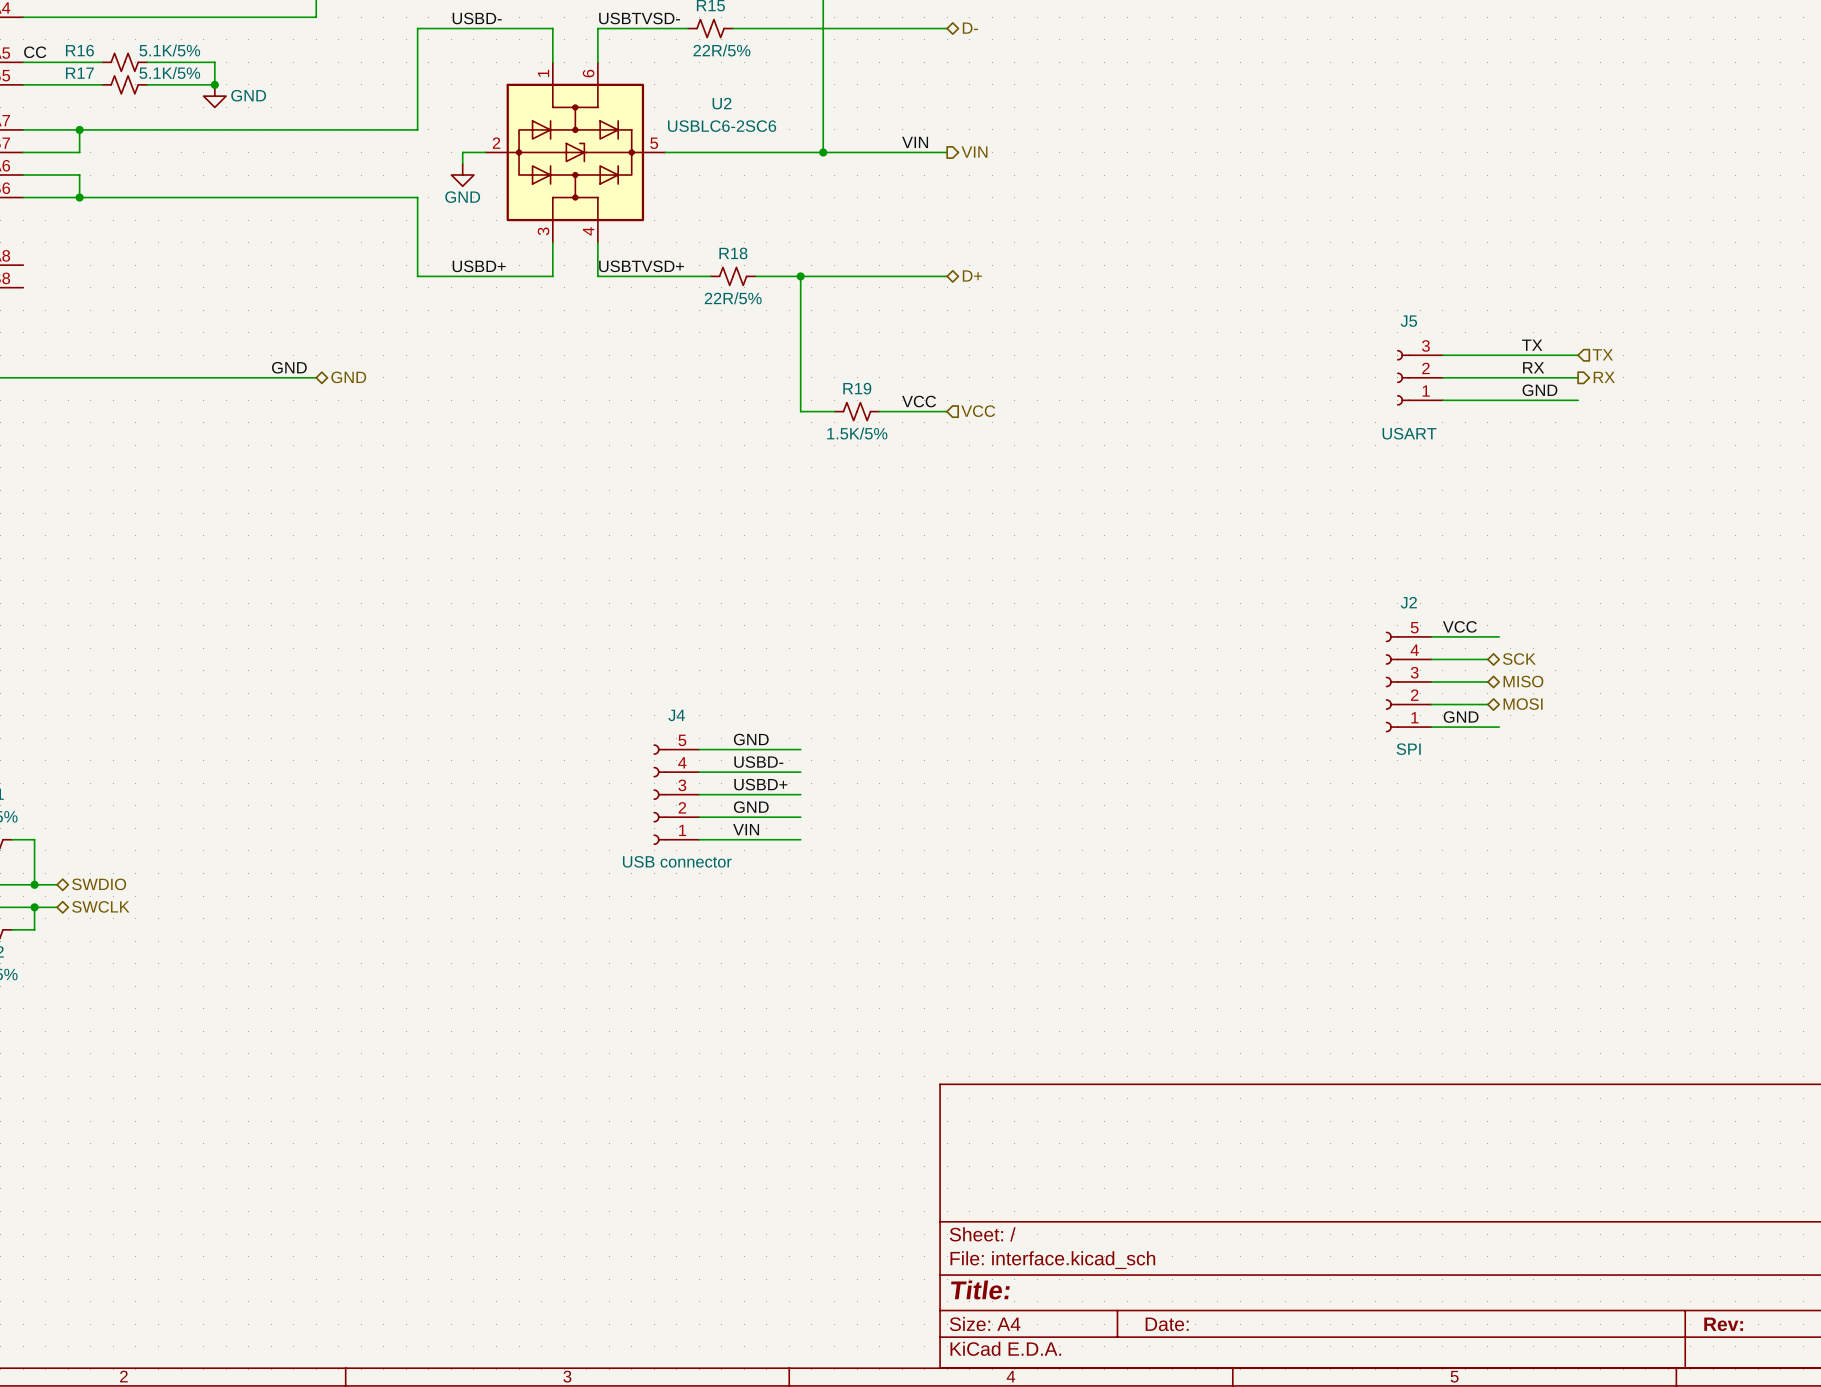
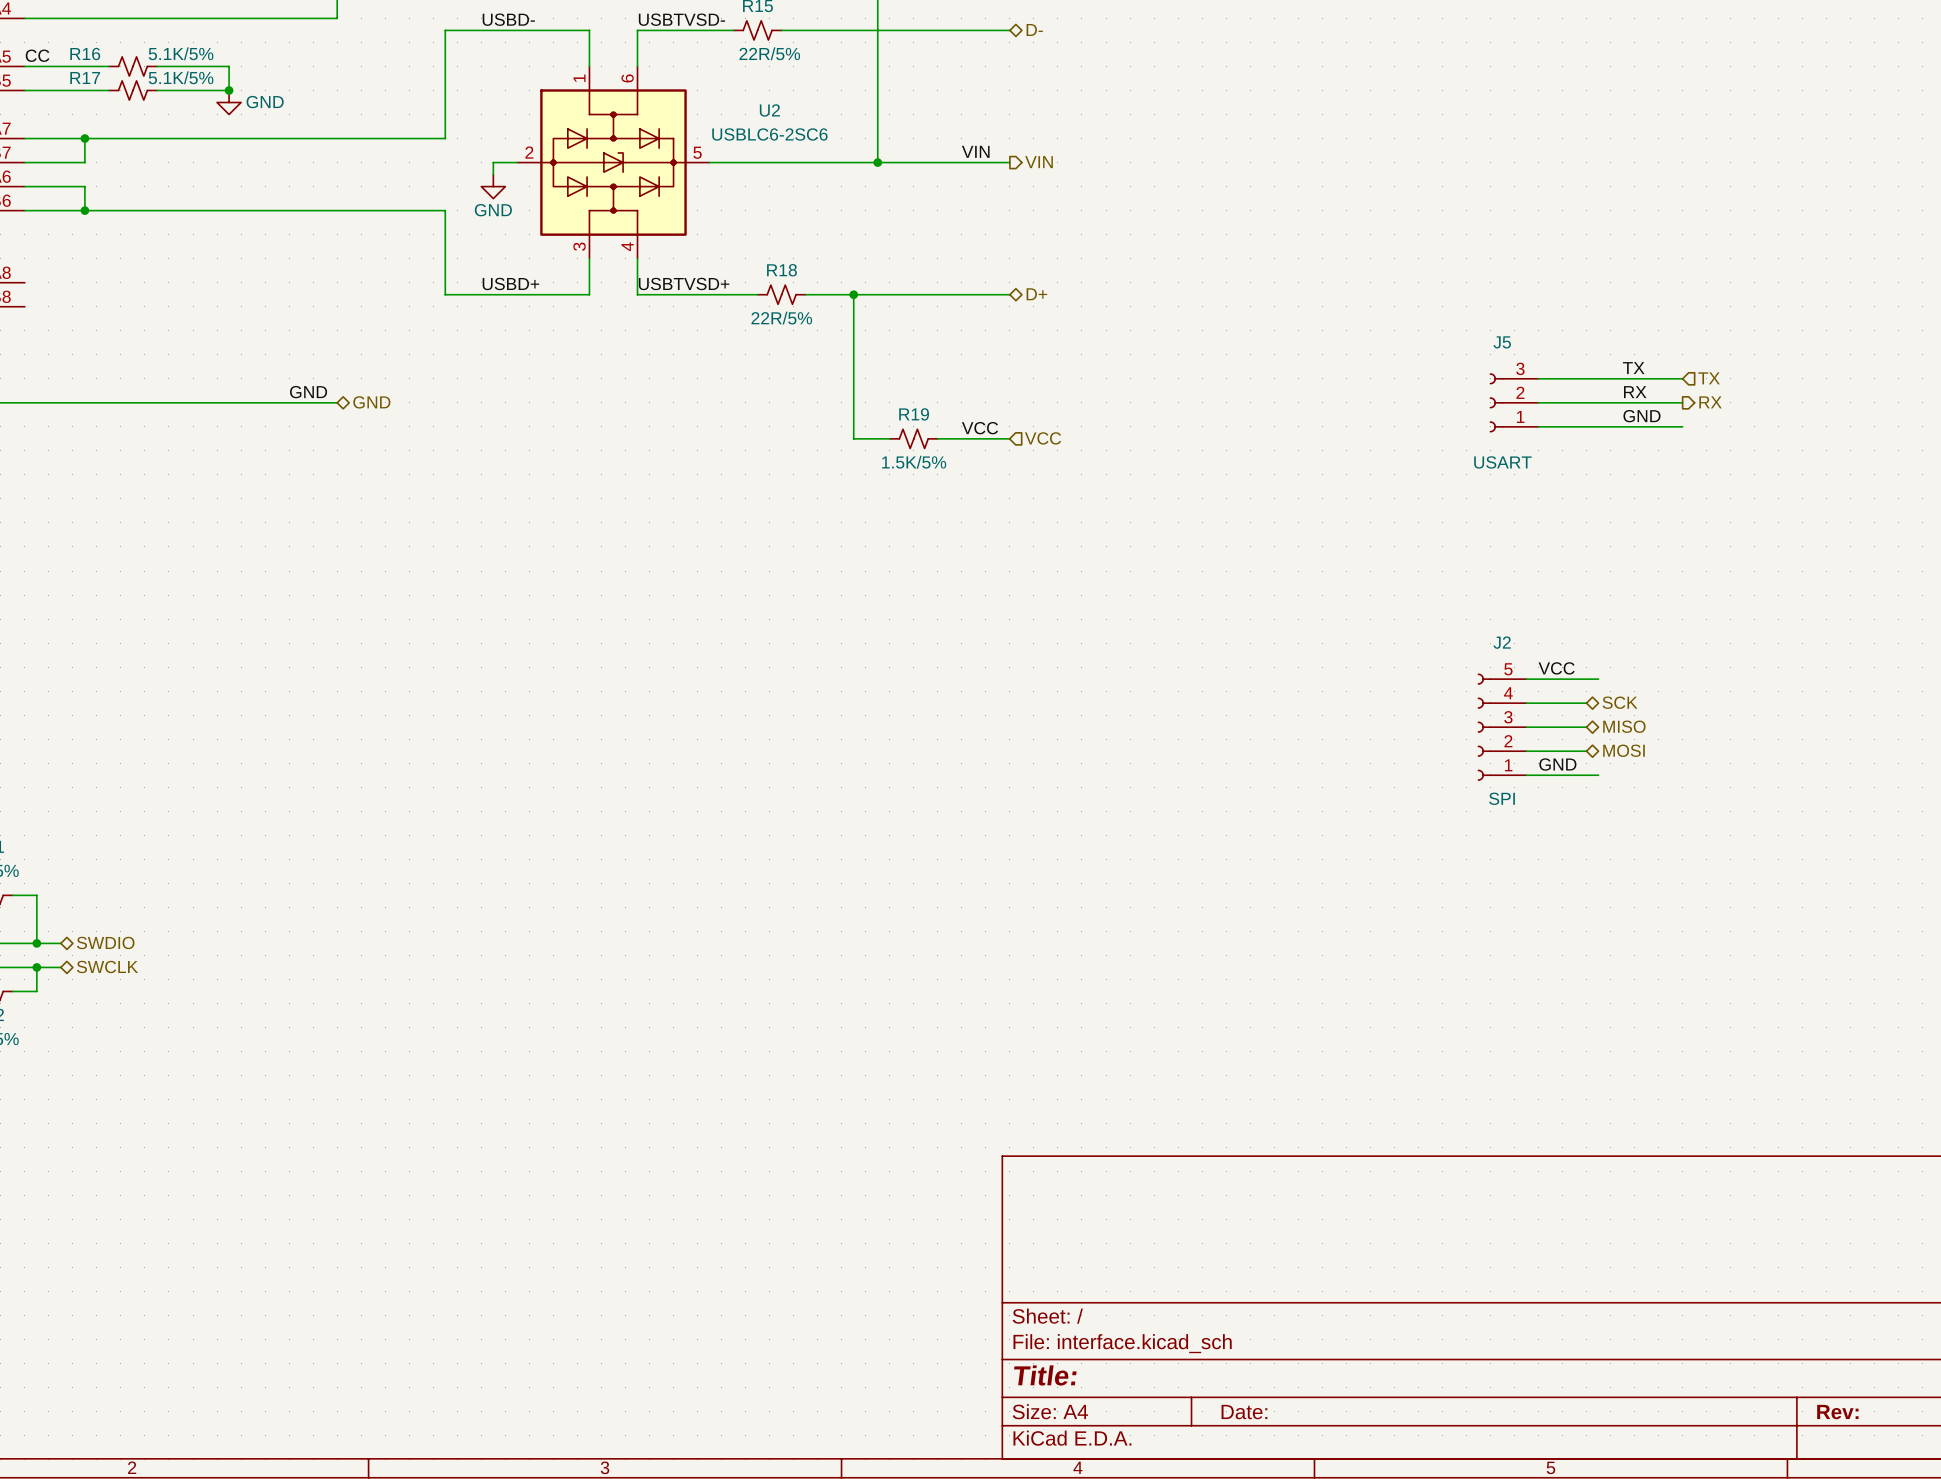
label: GND (751, 739) -> none
wire: (699, 749) (800, 749) -> none
label: USBD- (758, 762) -> none
wire: (699, 772) (800, 772) -> none
label: USBD+ (760, 784) -> none
J4: USB connector (676, 794) -> none
wire: (699, 794) (800, 794) -> none
label: GND (751, 807) -> none
wire: (699, 817) (800, 817) -> none
label: VIN (746, 829) -> none
wire: (699, 839) (800, 839) -> none

